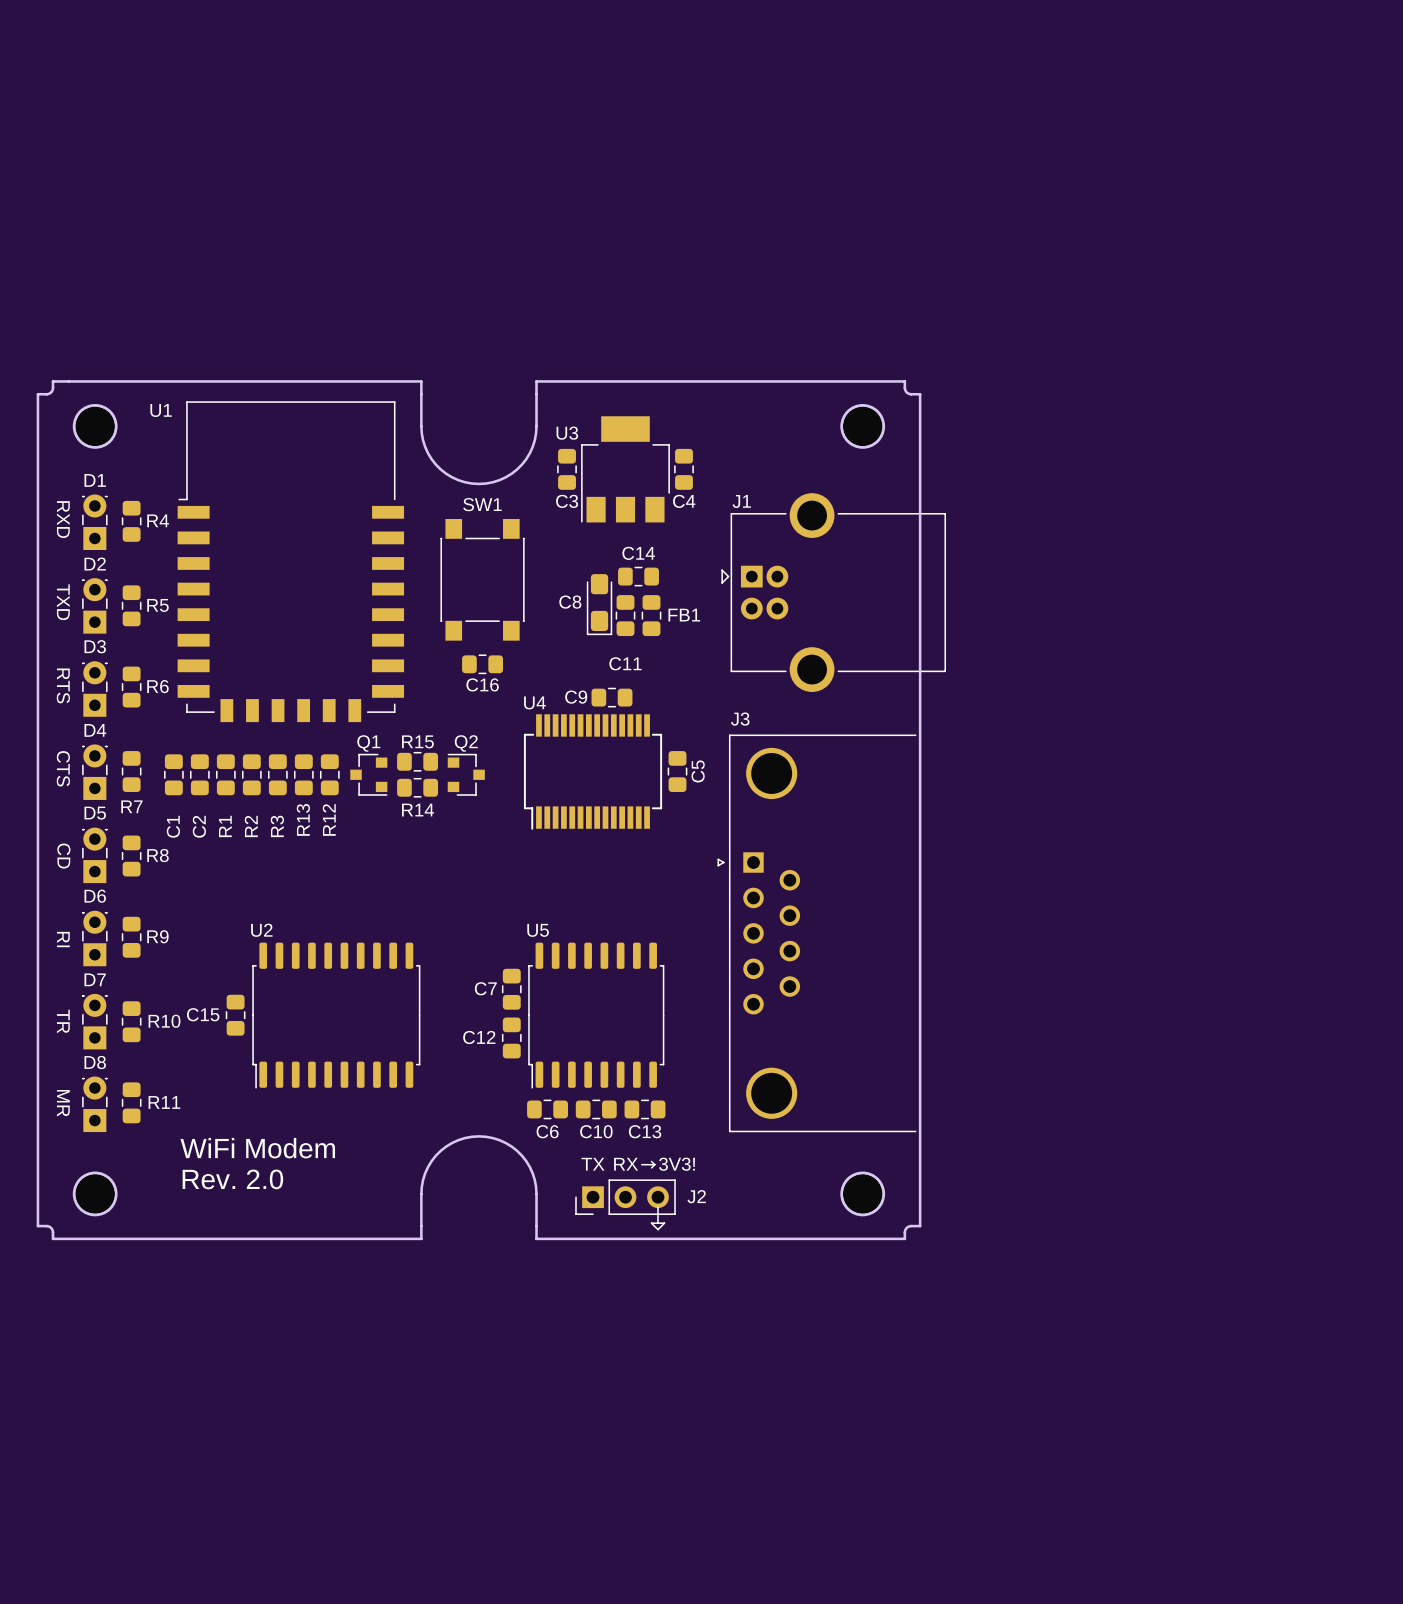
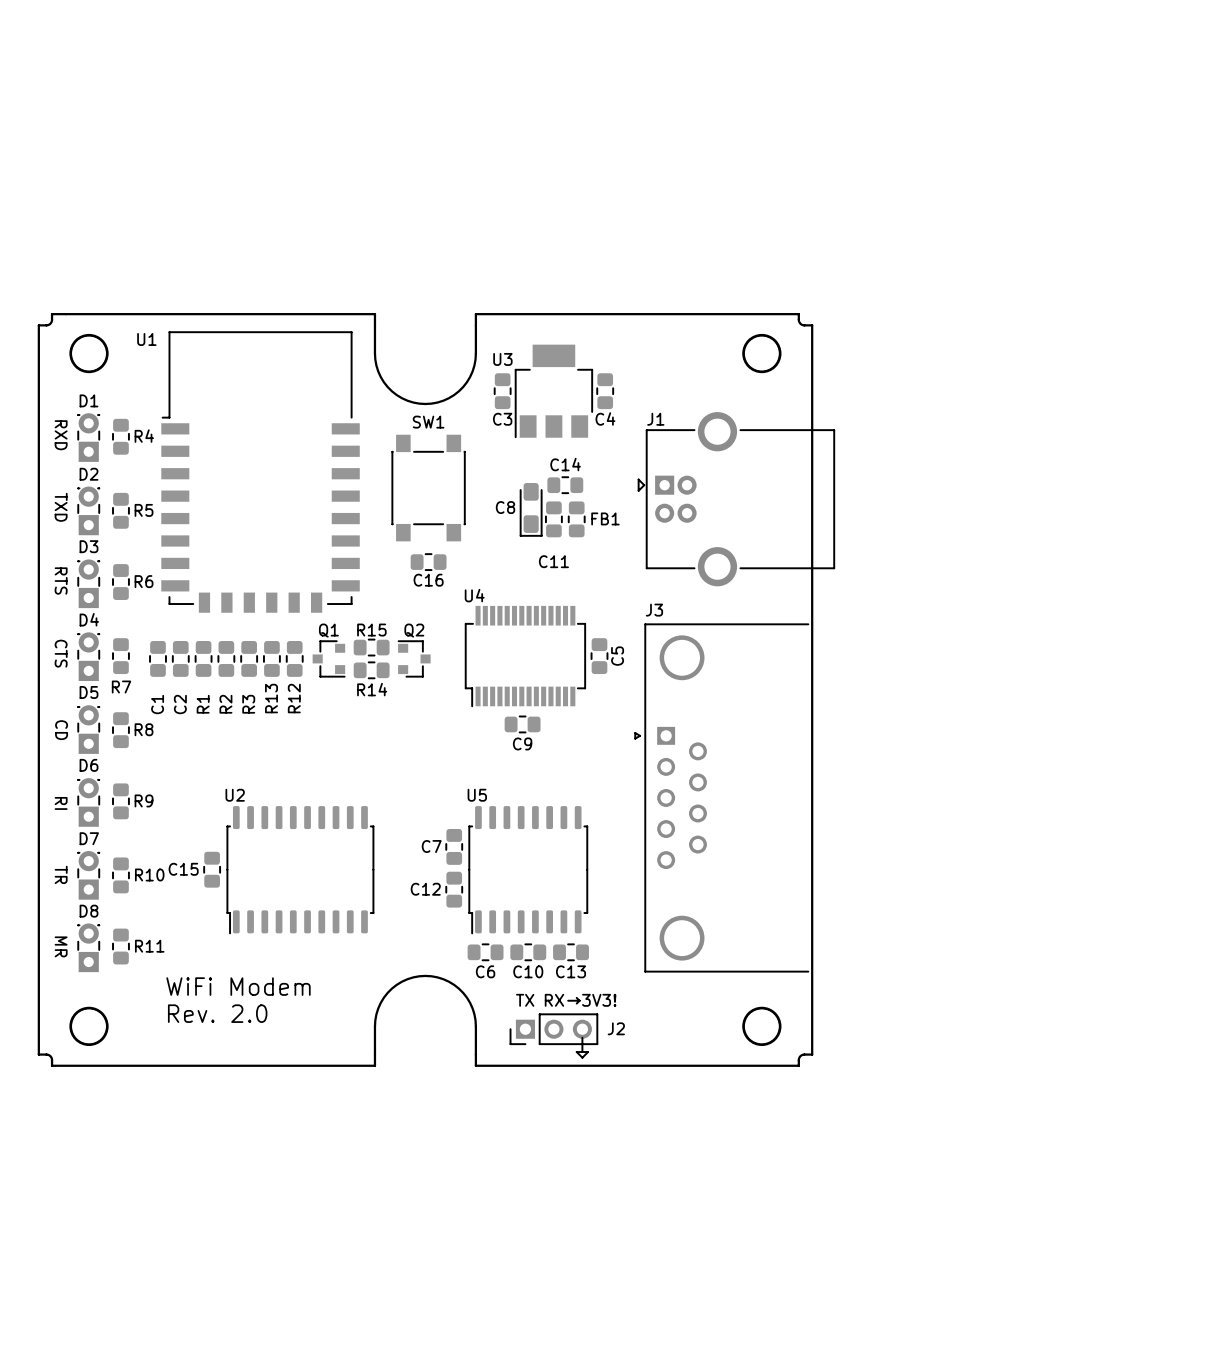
C9 name position: C9 (576, 697) -> C9 (522, 743)
C9 position: (611, 697) -> (522, 724)

